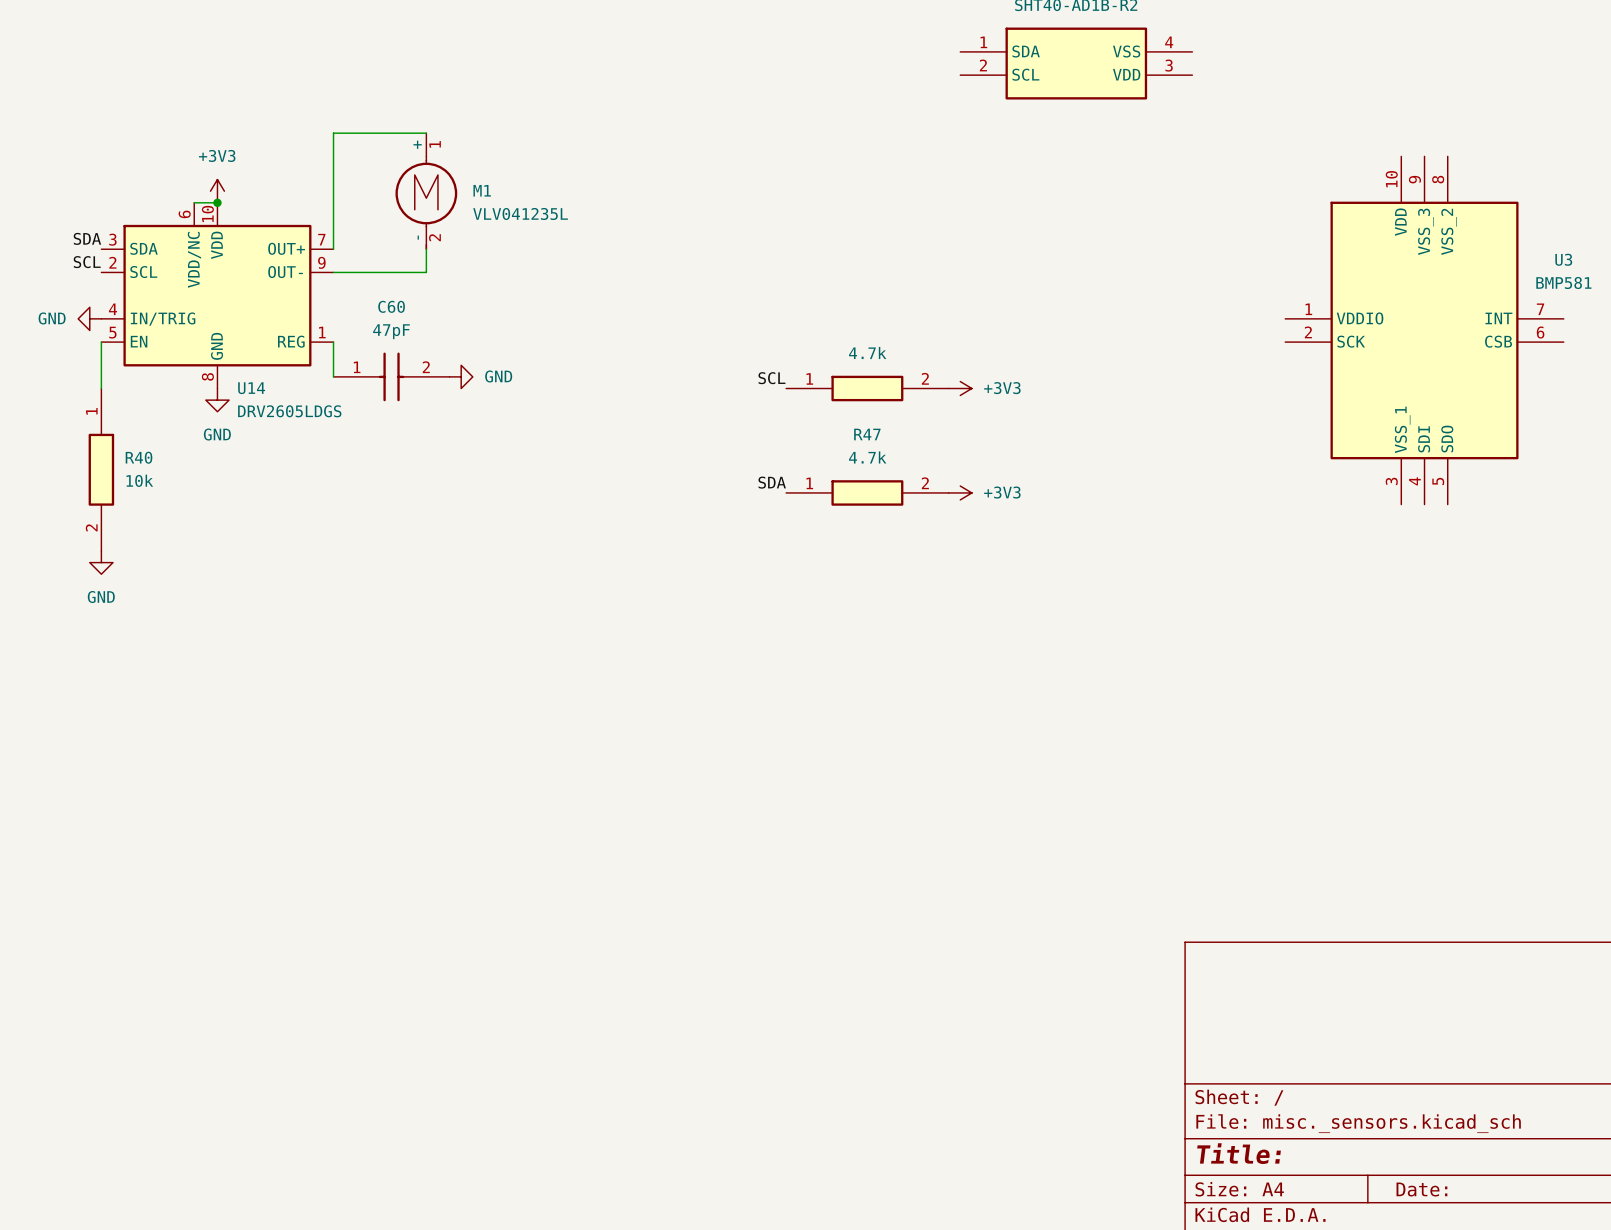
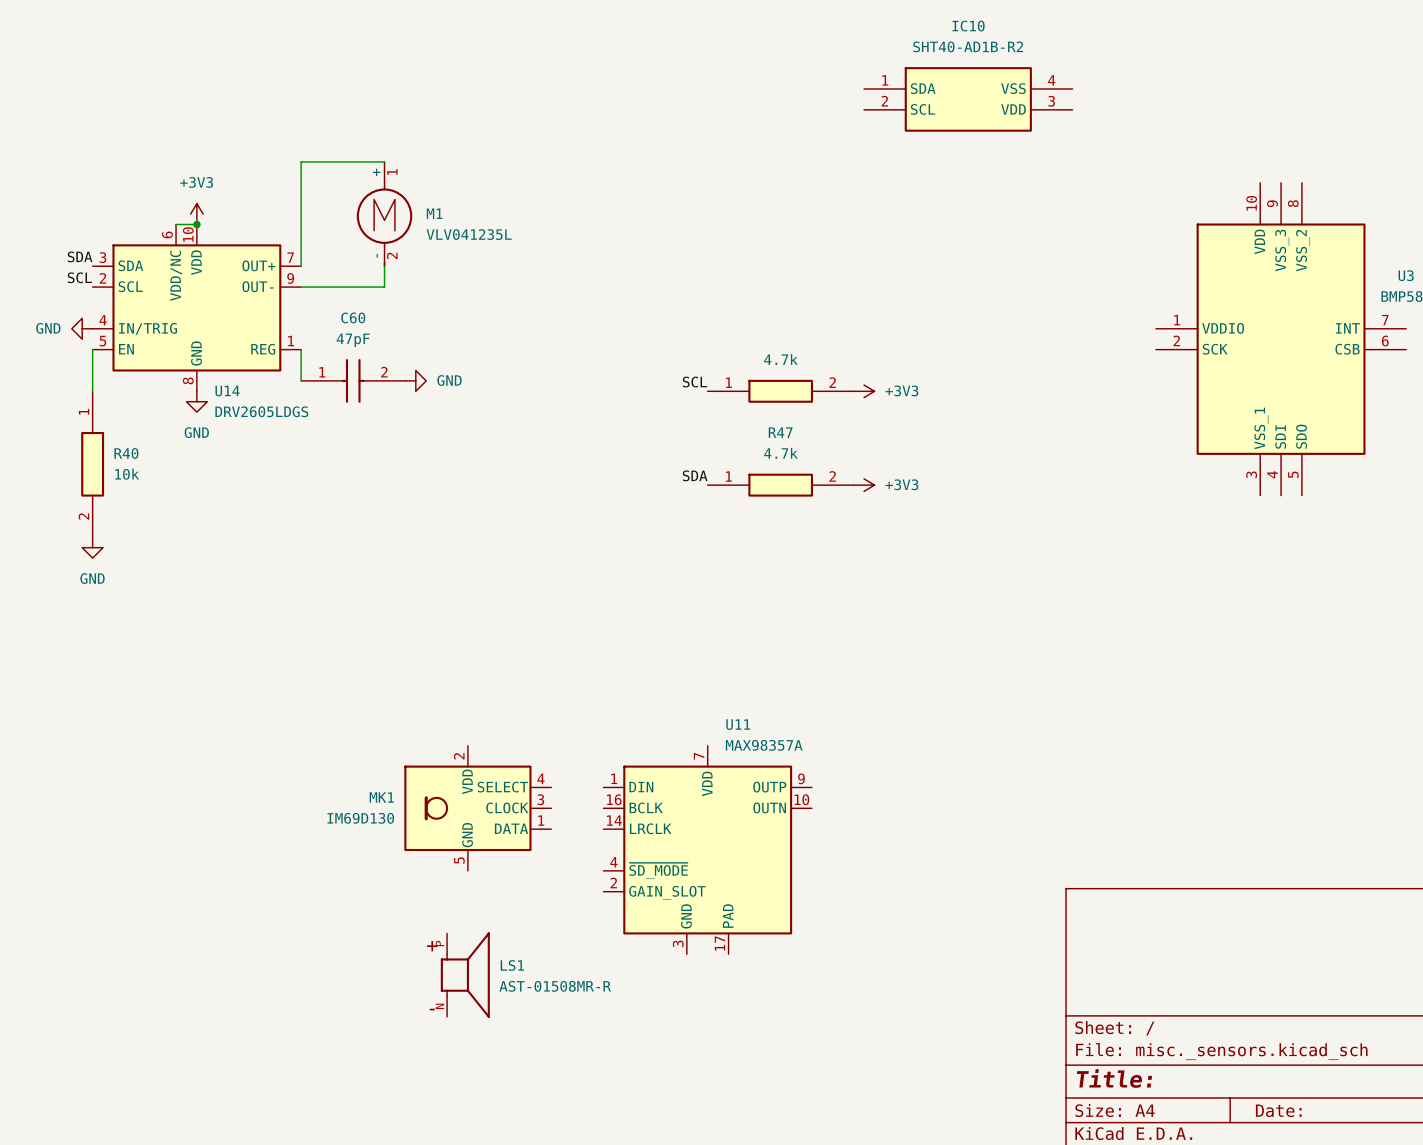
MK1: none -> IM69D130 (477, 808)
U11: none -> MAX98357A (707, 850)
LS1: none -> AST-01508MR-R (465, 975)

